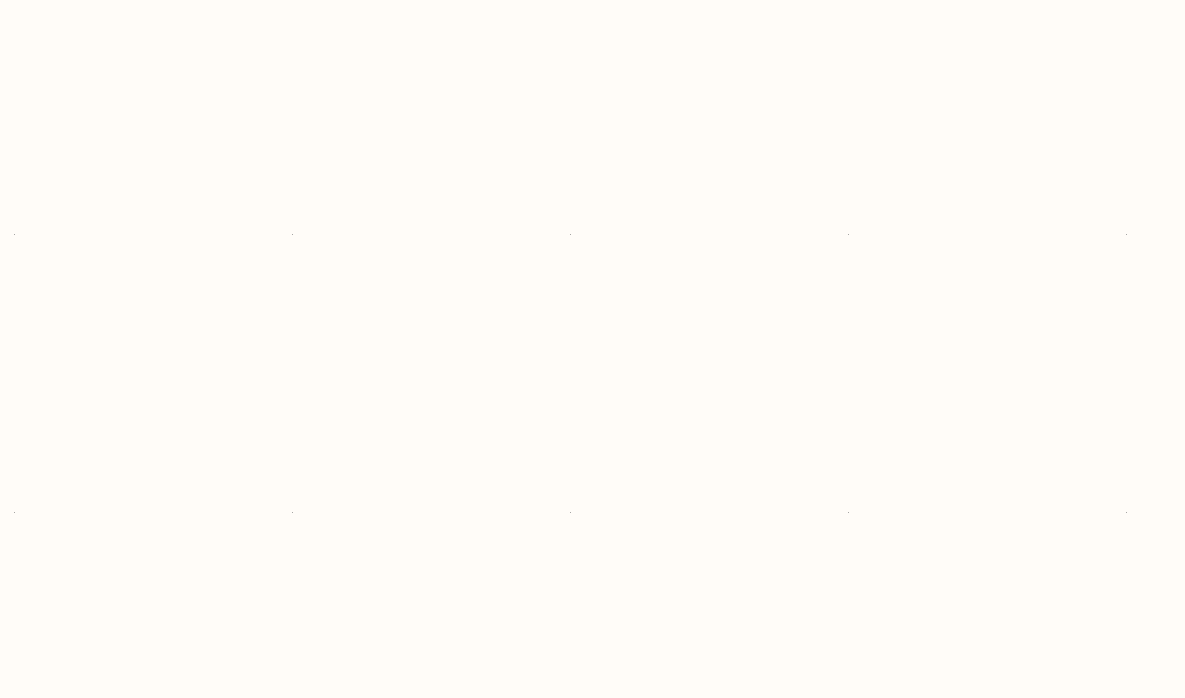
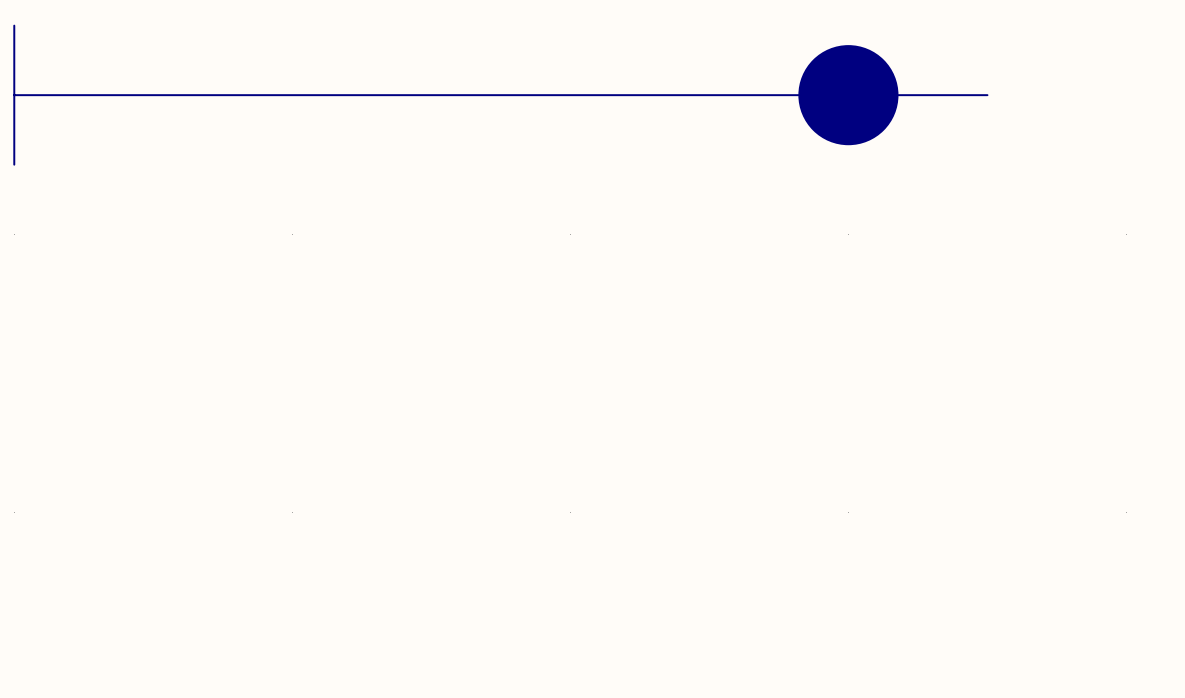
wire: none -> (14, 25) (14, 164)
wire: none -> (14, 95) (987, 95)
junction: none -> (848, 95)

